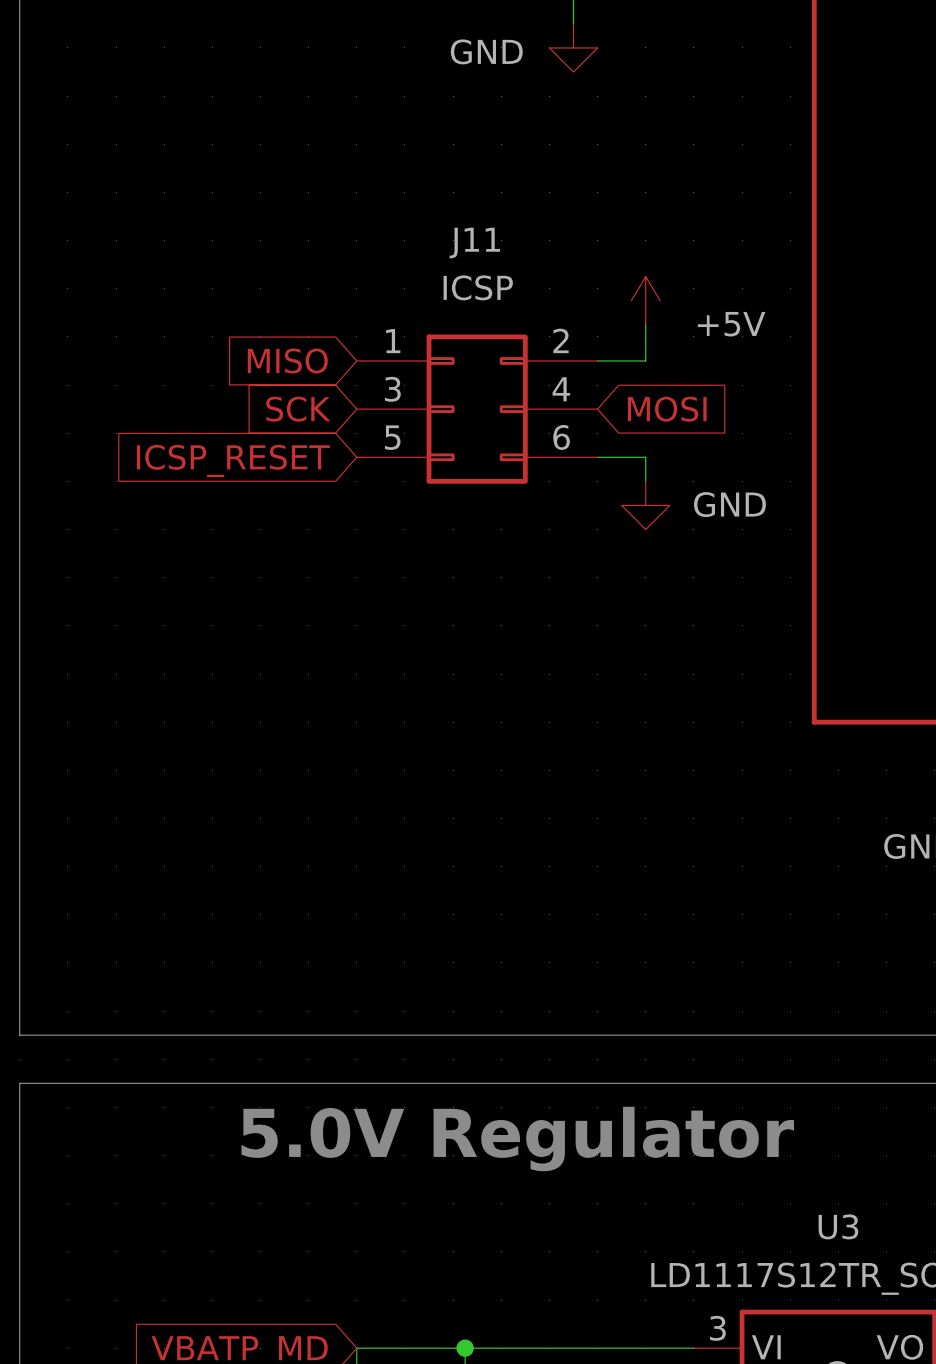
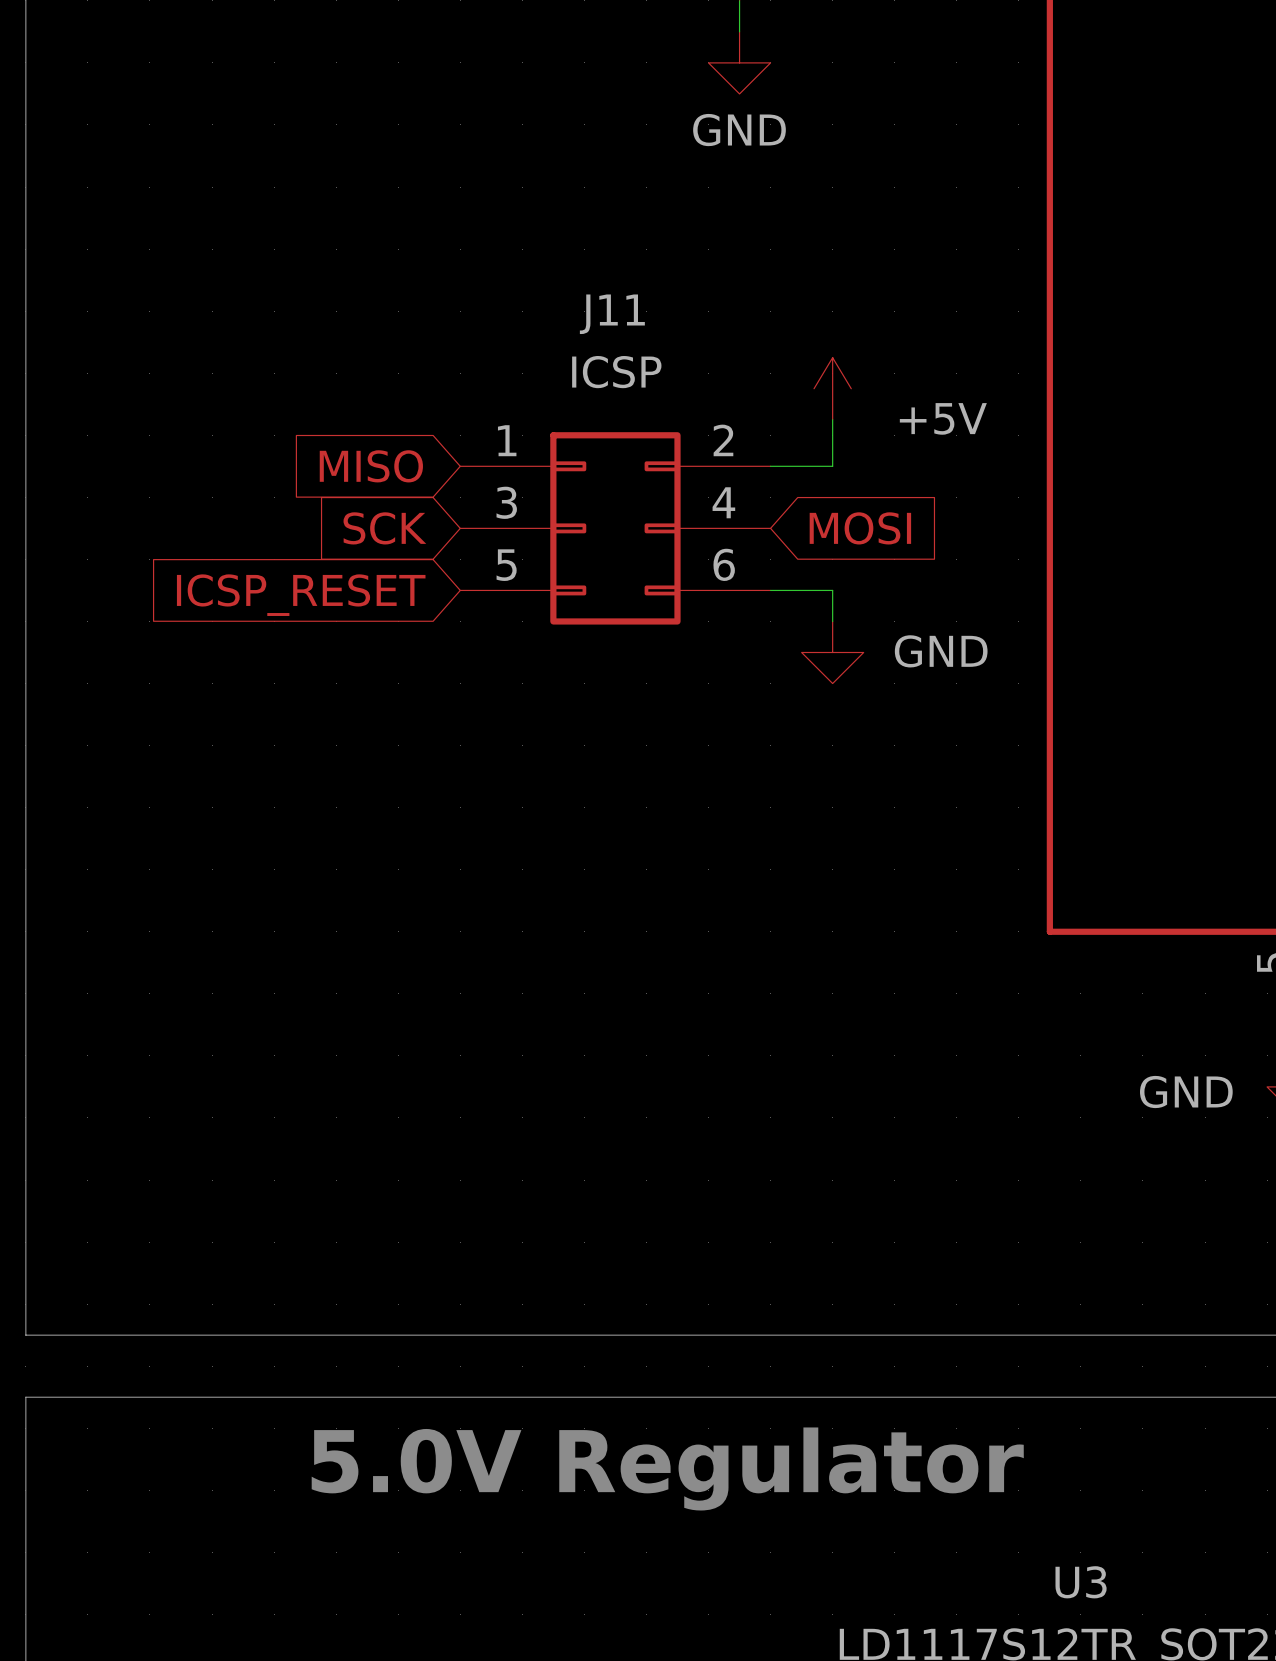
power symbol text position: GND (486, 51) -> GND (739, 130)

